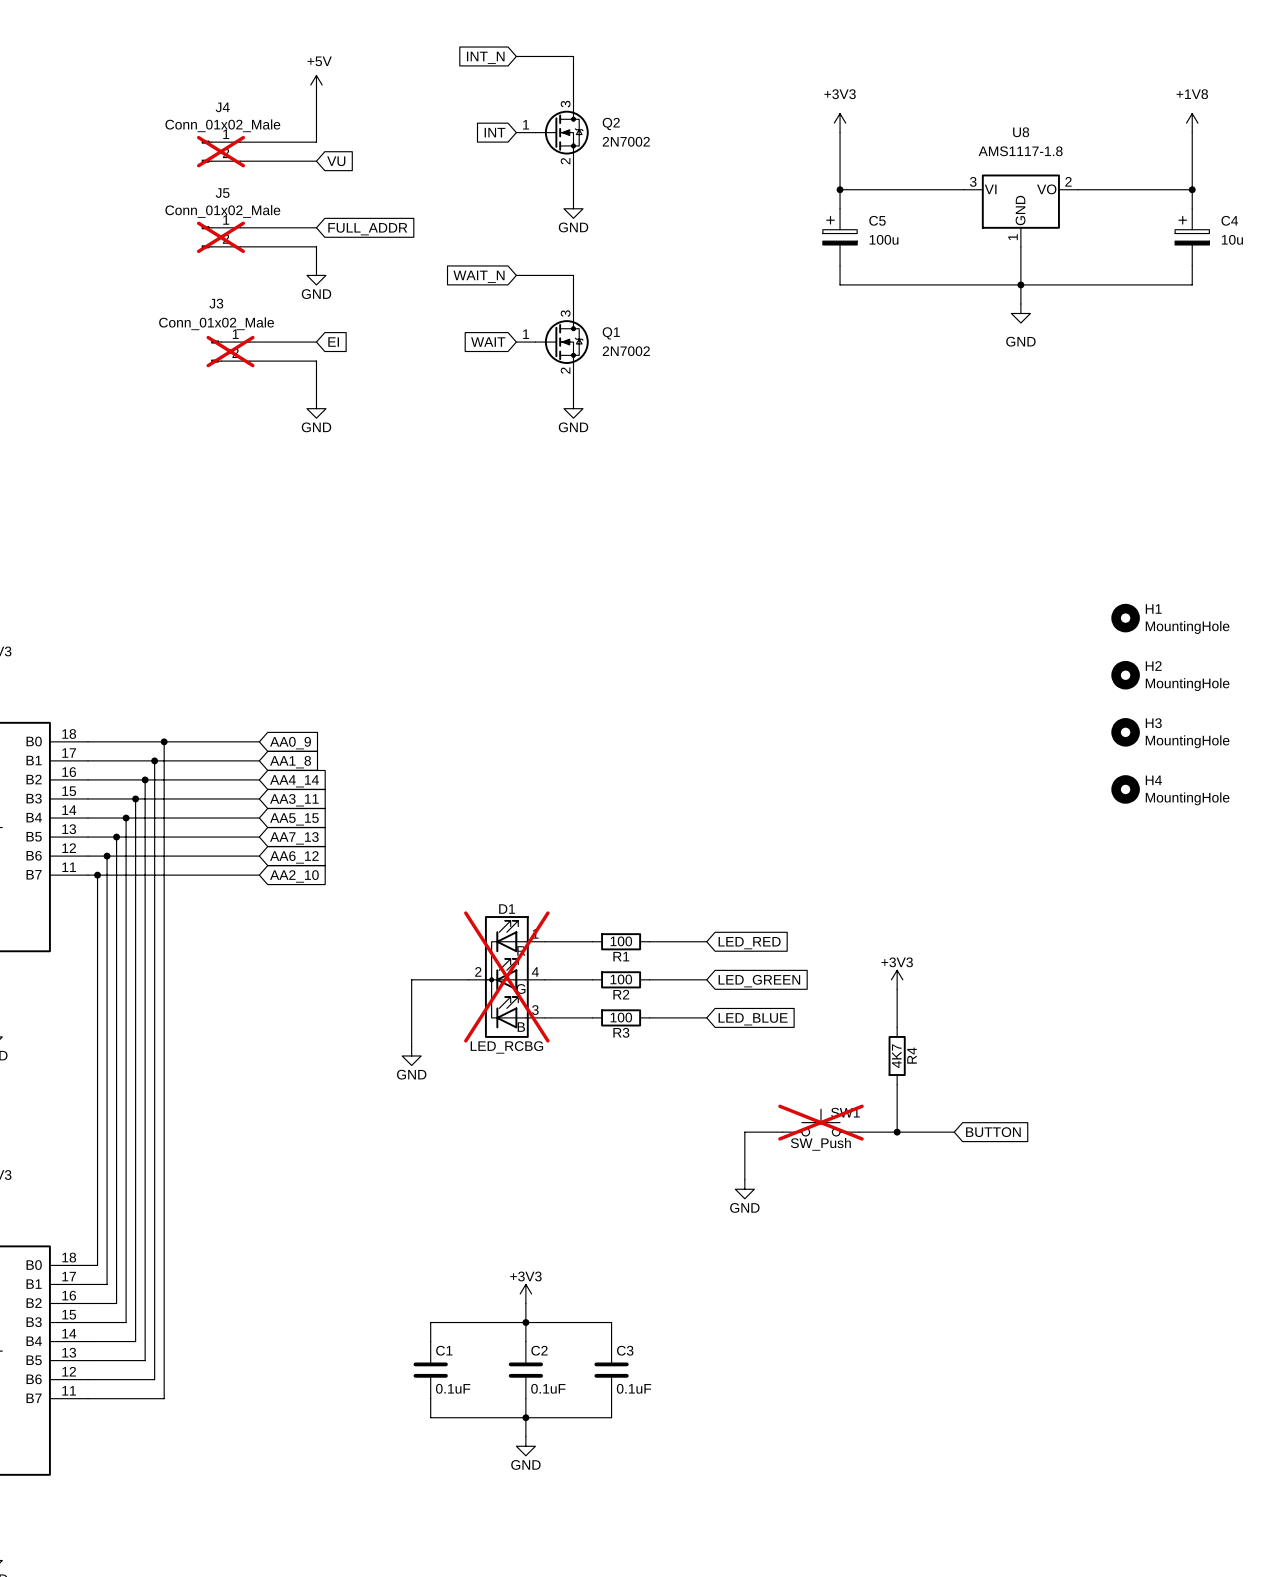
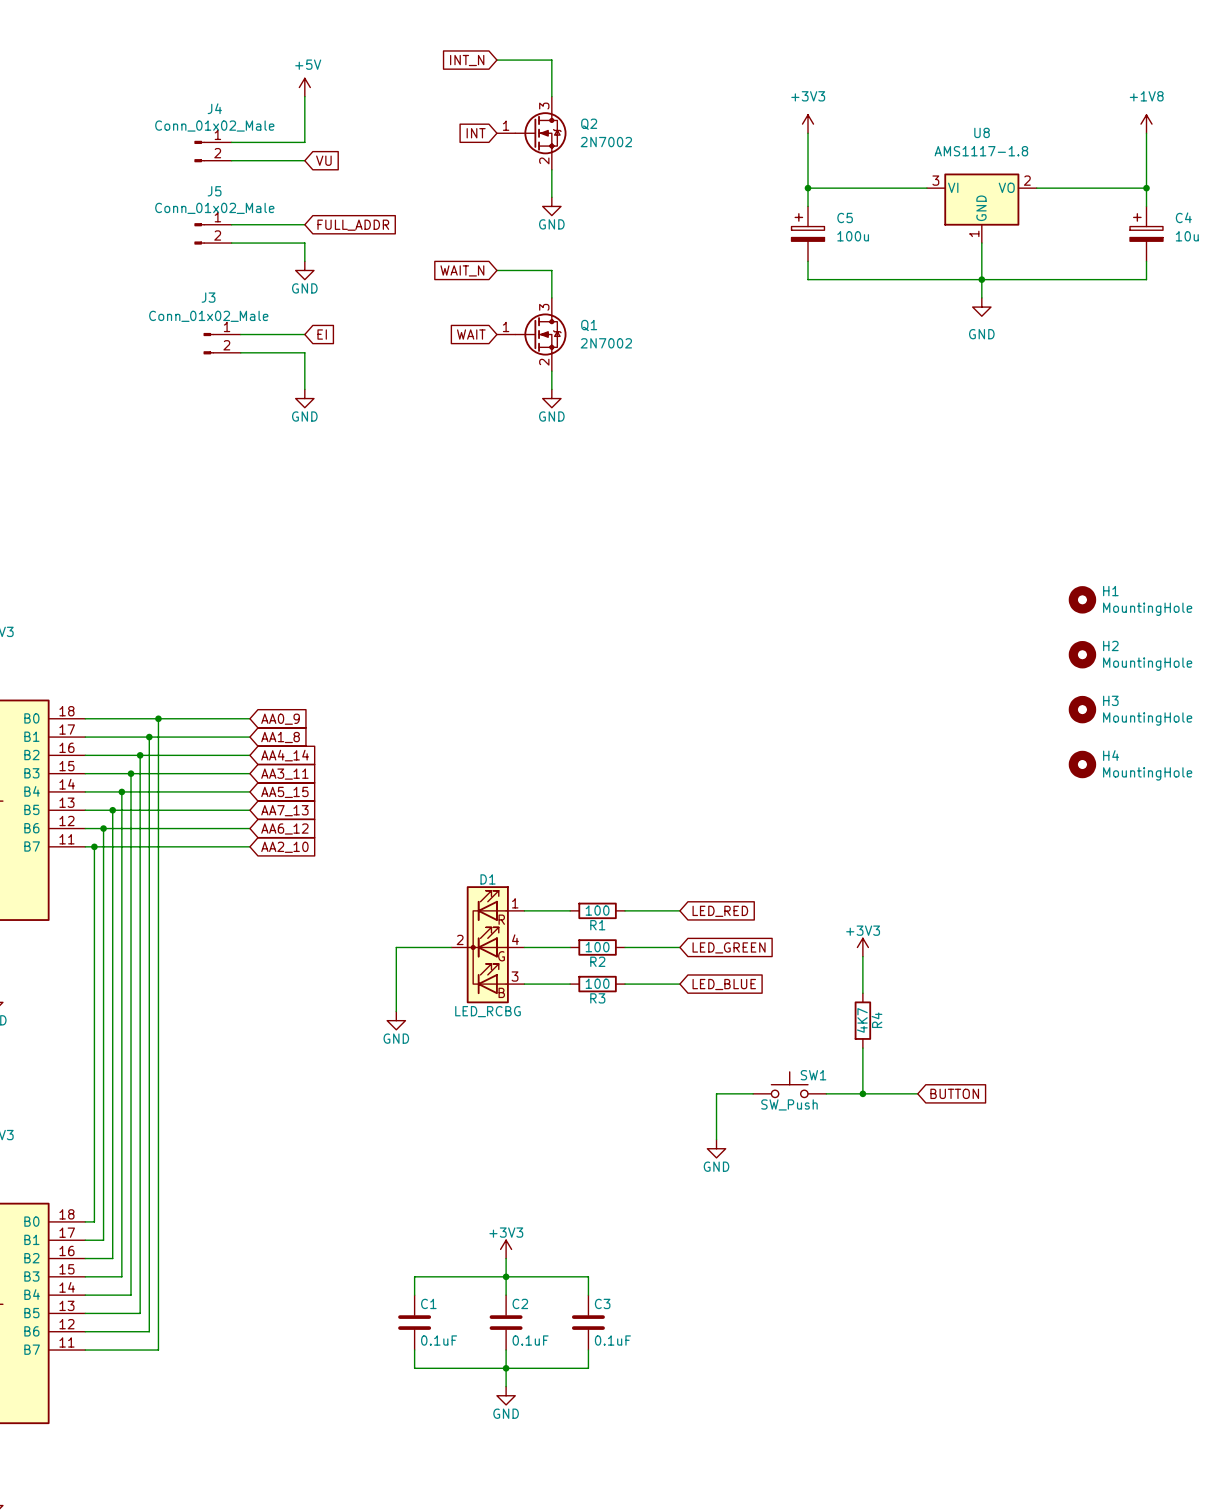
J4 do-not-place cross: (220, 151) -> none
J5 do-not-place cross: (220, 237) -> none
J3 do-not-place cross: (230, 351) -> none
D1 do-not-place cross: (506, 976) -> none
SW1 do-not-place cross: (820, 1122) -> none

